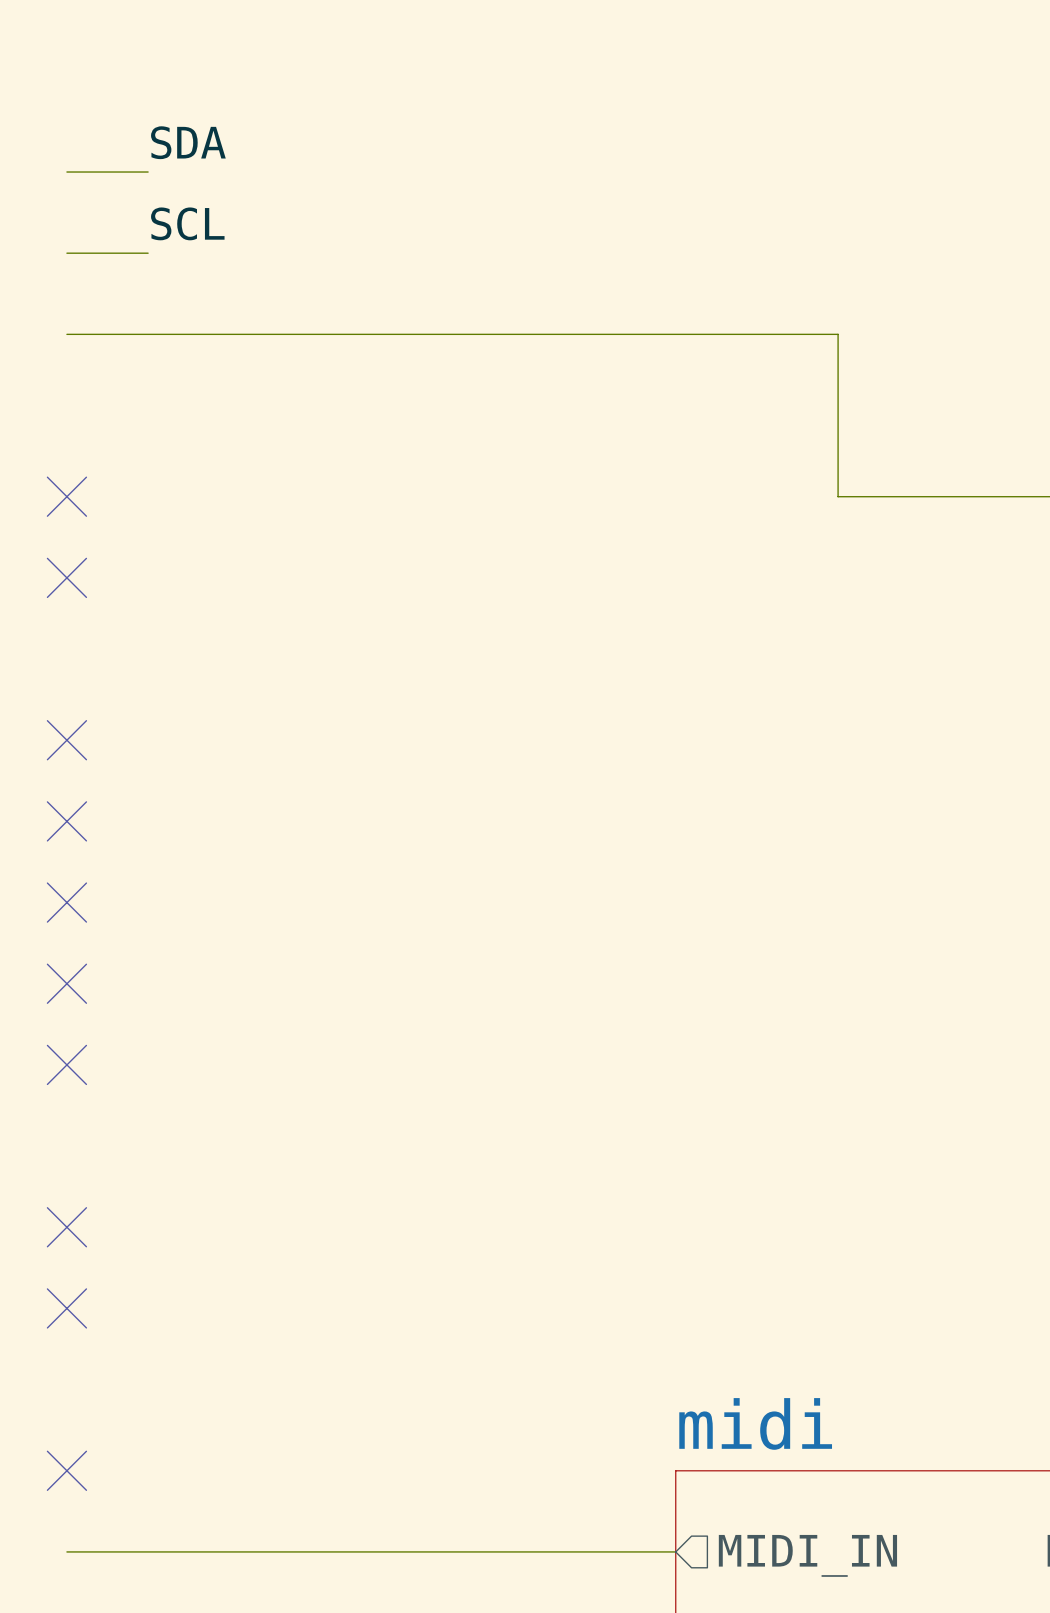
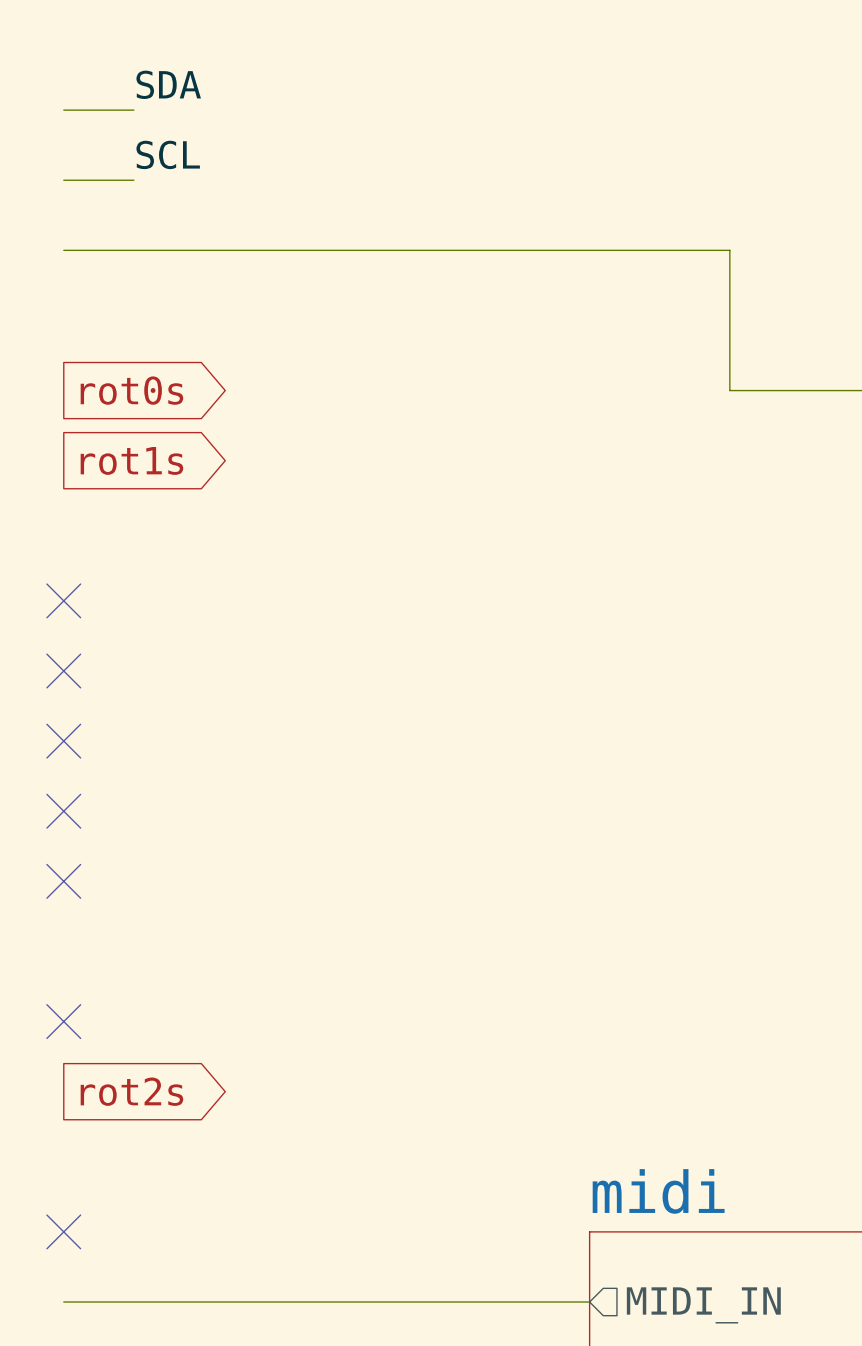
no-connect mark: (66, 496) -> none
global label: none -> rot0s (131, 390)
no-connect mark: (66, 577) -> none
global label: none -> rot1s (131, 460)
no-connect mark: (66, 1308) -> none
global label: none -> rot2s (131, 1091)

